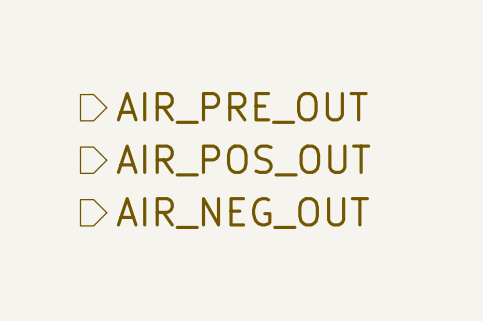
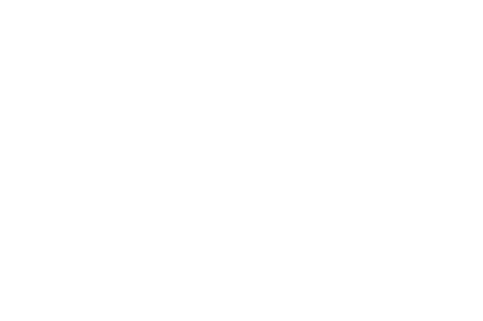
hierarchical label: AIR_PRE_OUT (242, 107) -> none
hierarchical label: AIR_POS_OUT (243, 160) -> none
hierarchical label: AIR_NEG_OUT (242, 213) -> none

